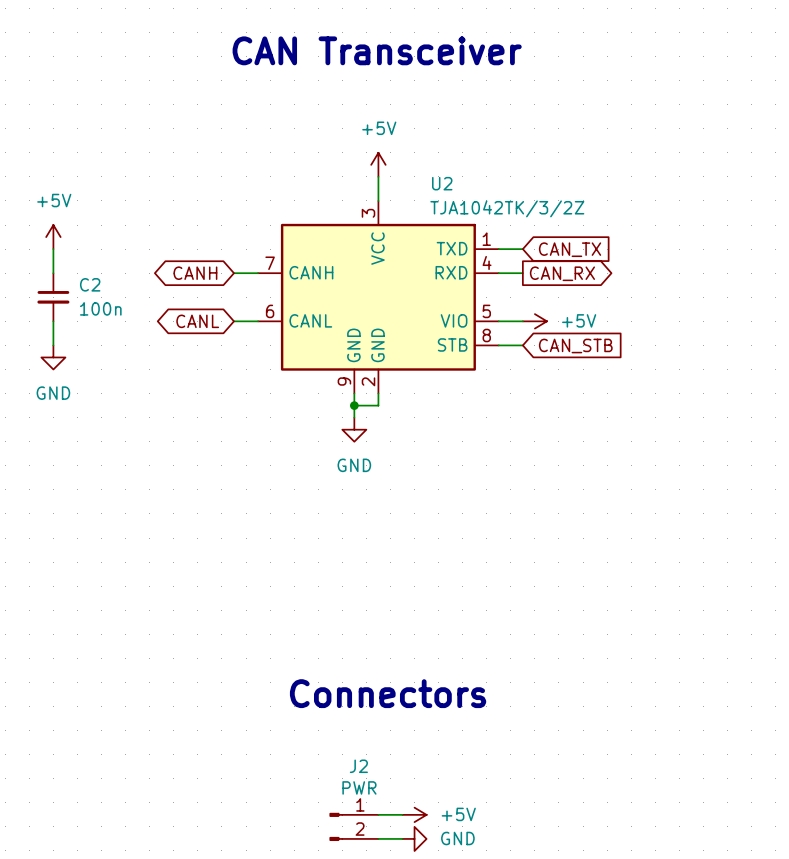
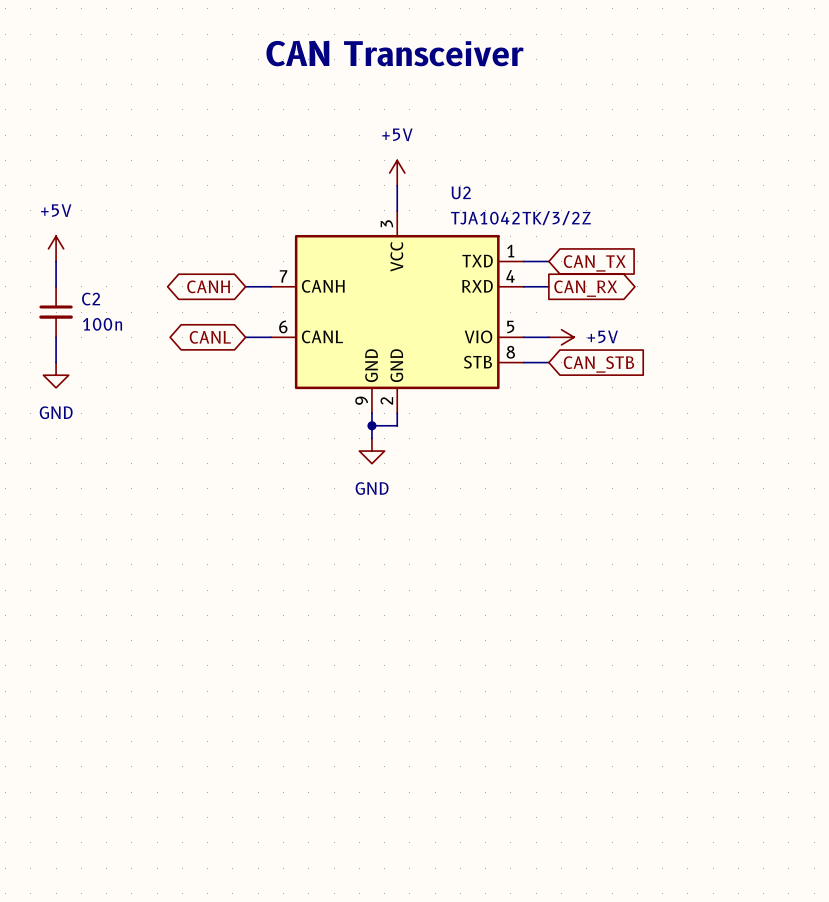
text: Connectors (388, 693) -> none
wire: (378, 814) (402, 814) -> none
power symbol: +5V (414, 814) -> none
J2: PWR (353, 826) -> none
wire: (378, 838) (402, 838) -> none
power symbol: GND (414, 838) -> none

